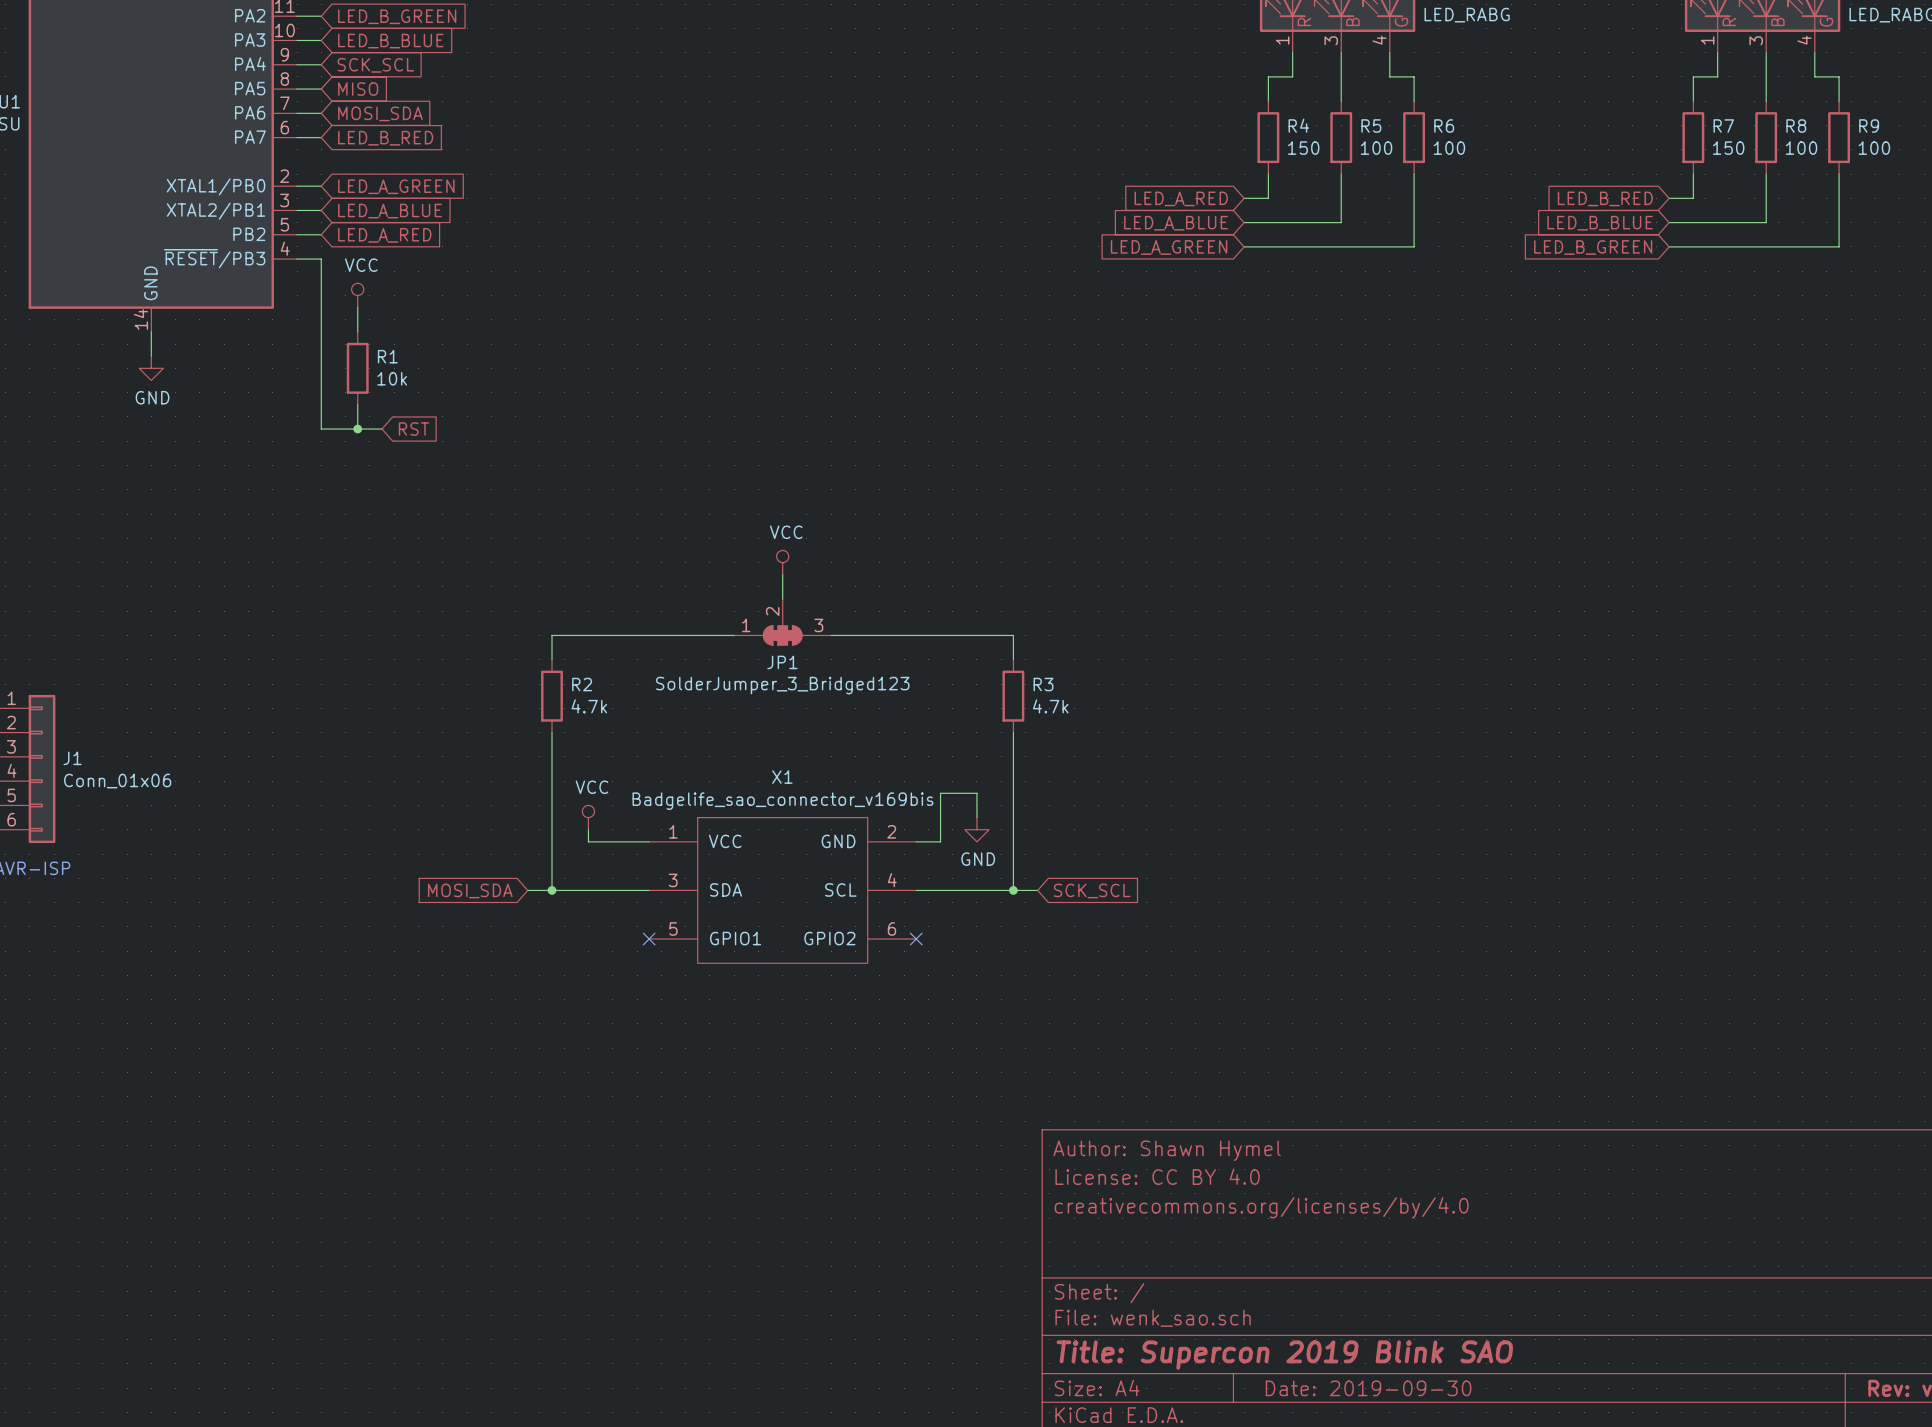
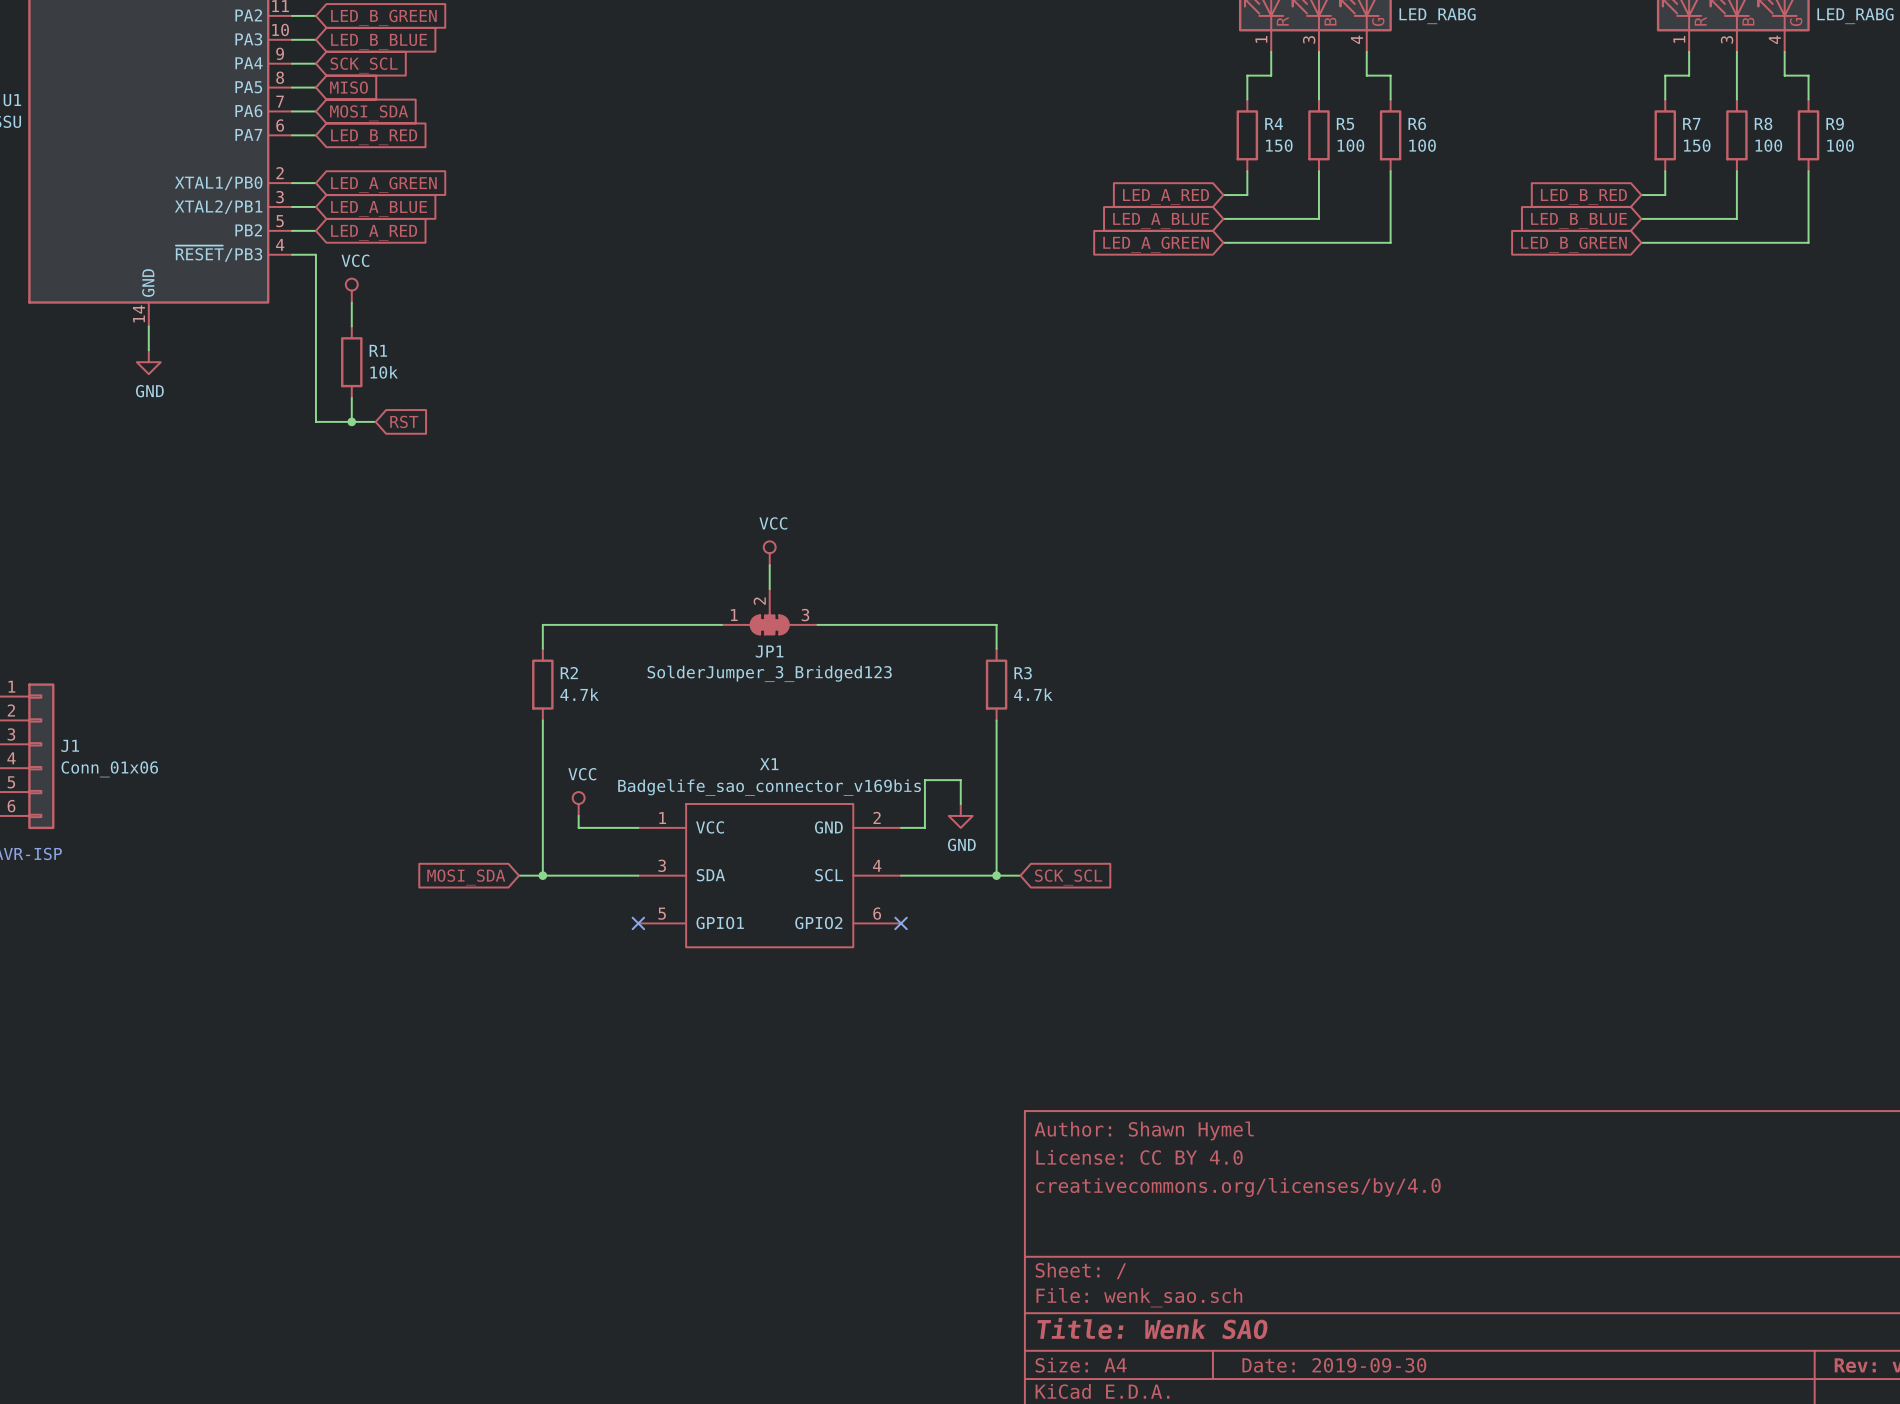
title block: Title: Supercon 2019 Blink SAO (1284, 1355) -> Title: Wenk SAO (1152, 1328)

